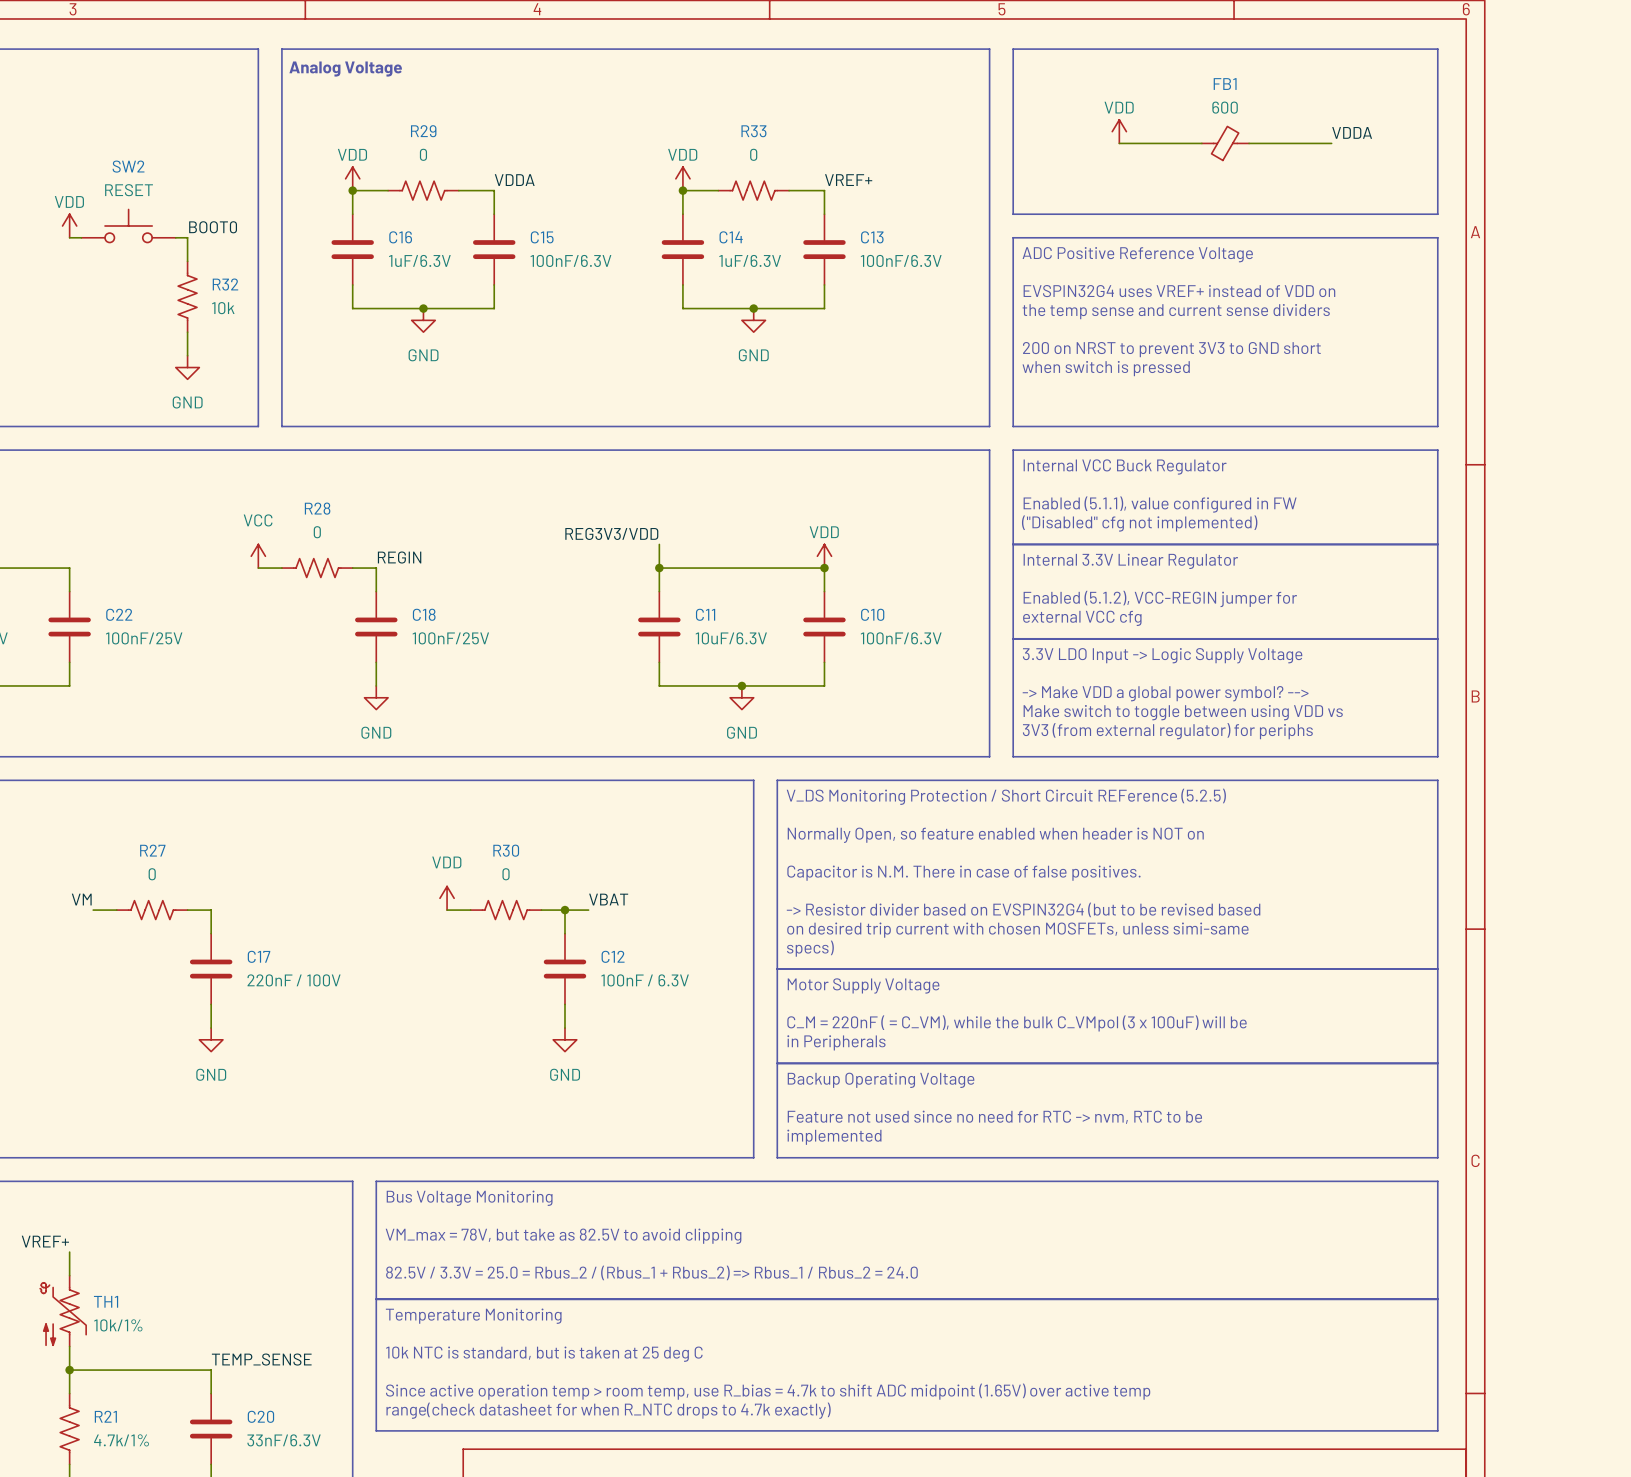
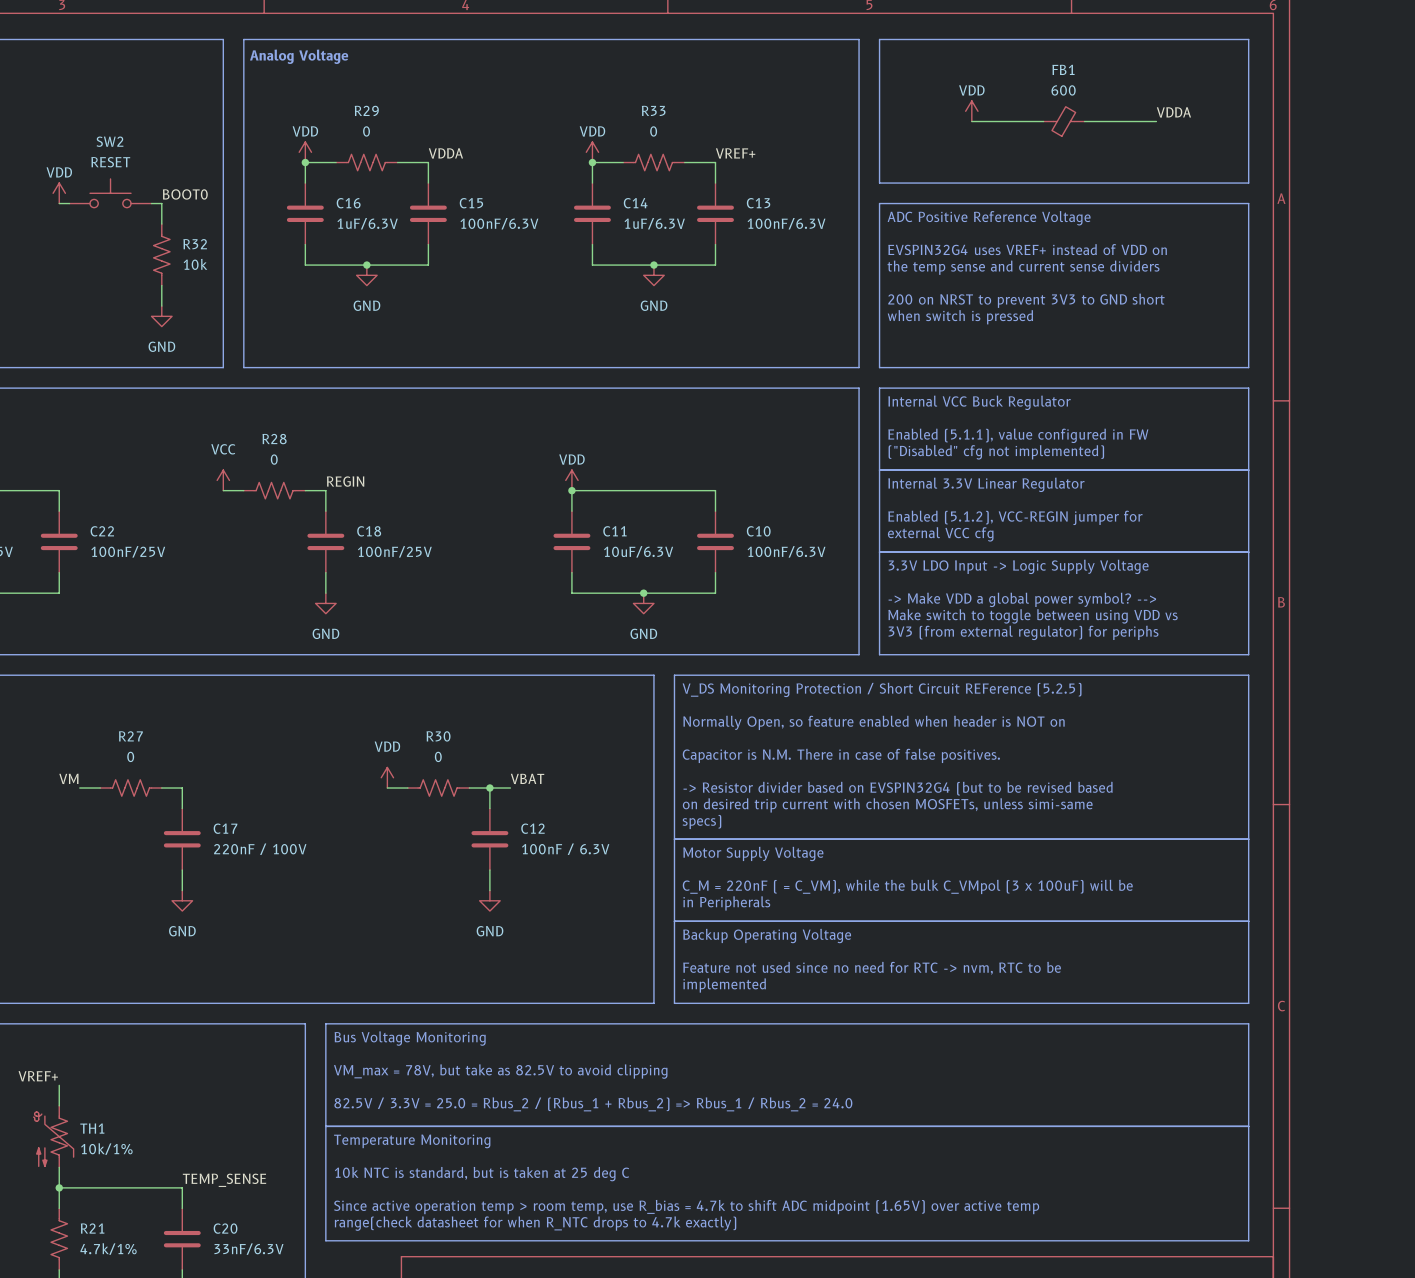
label: REG3V3/VDD (611, 533) -> none
power symbol position: VDD (824, 556) -> VDD (571, 480)
junction: (824, 568) -> none

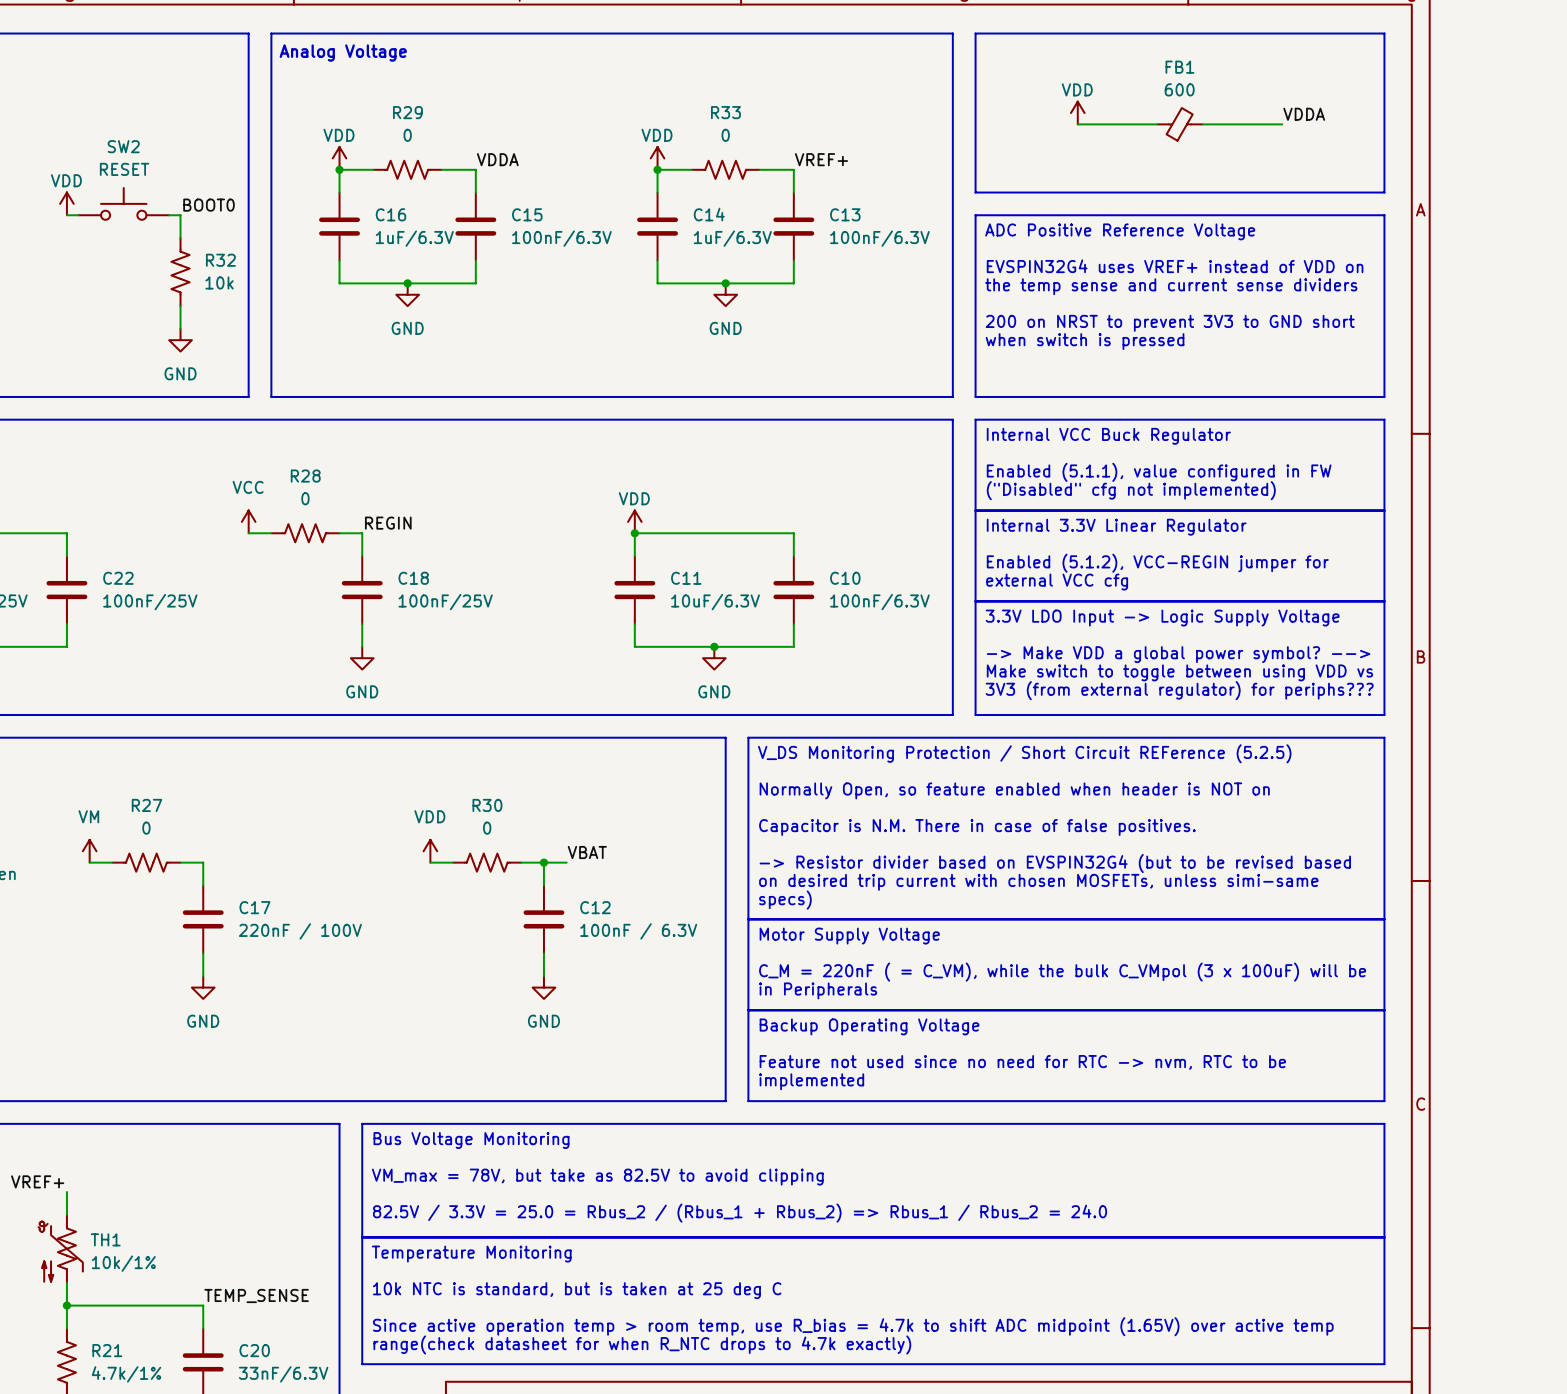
text: 3V3 (from external regulator) for periphs (1023, 632) -> 3V3 (from external regulator) for periphs??? (1179, 690)
power symbol: none -> VM (89, 851)
label: VM (68, 778) -> none

